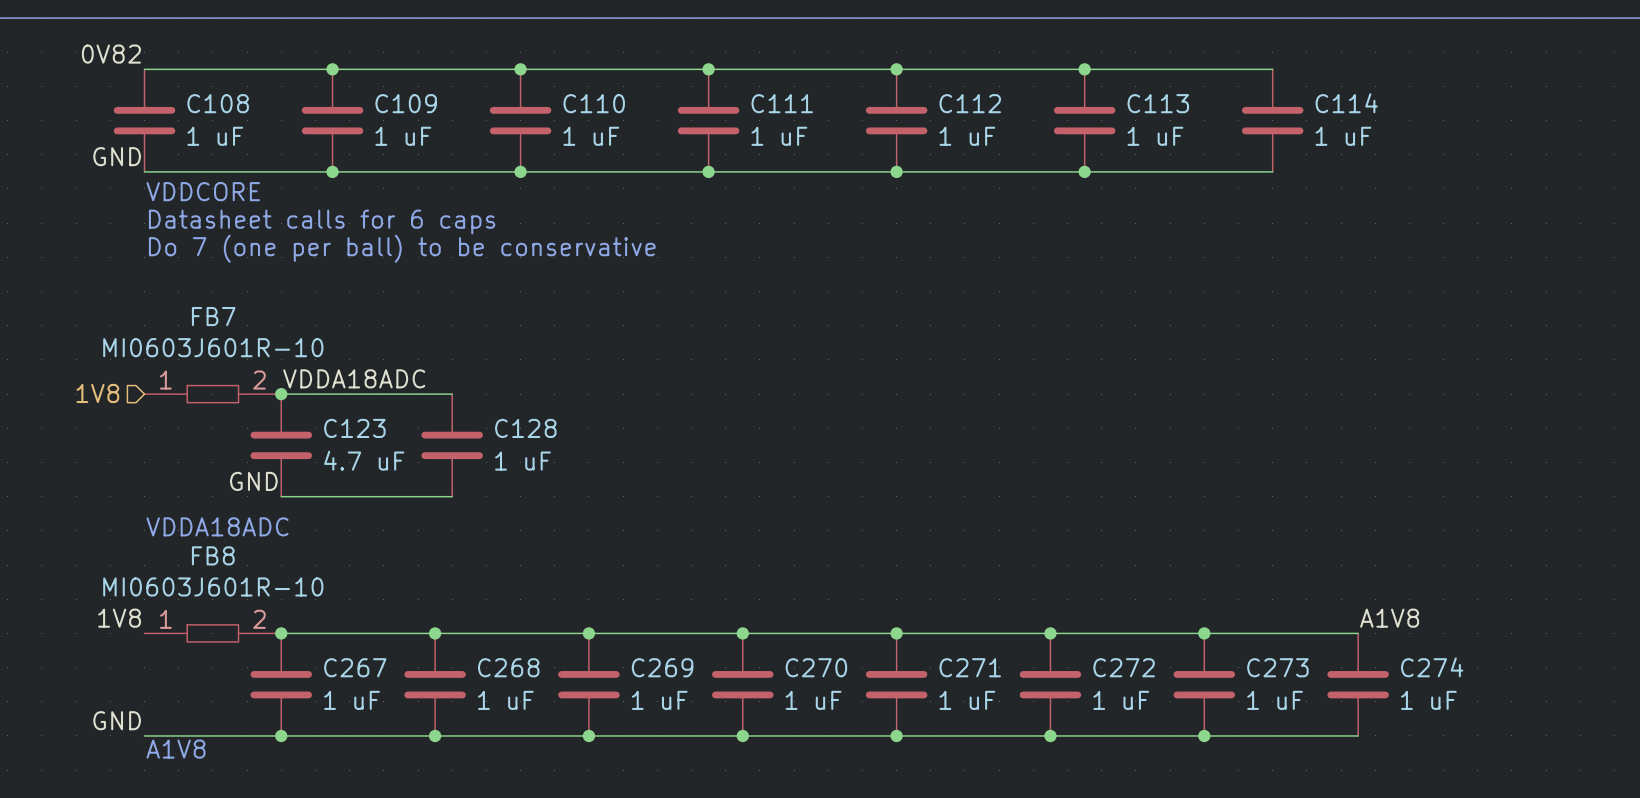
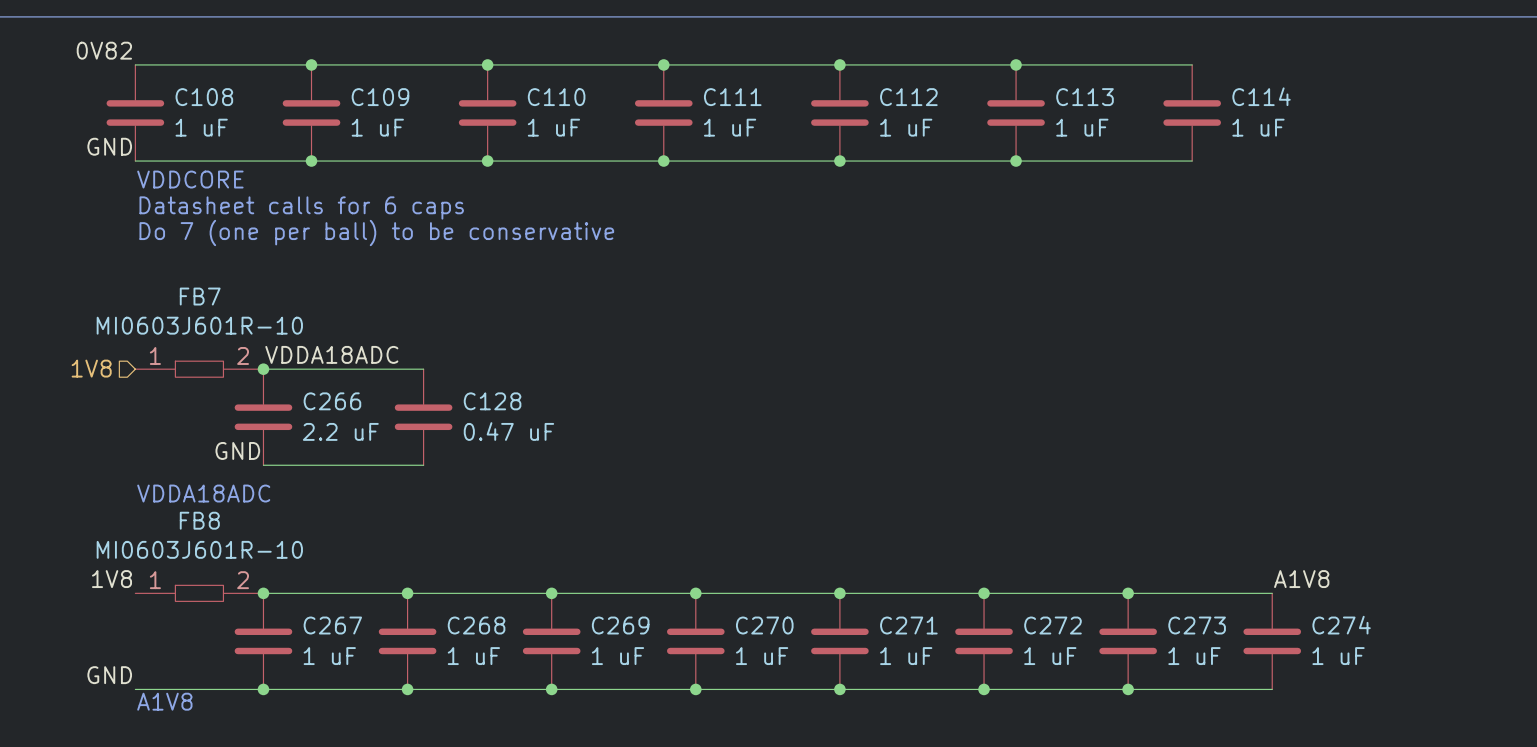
C123 name: C123 (354, 428) -> C266 (332, 401)
C123 value: 4.7 uF (364, 460) -> 2.2 uF (340, 431)
C128 value: 1 uF (522, 461) -> 0.47 uF (508, 431)

